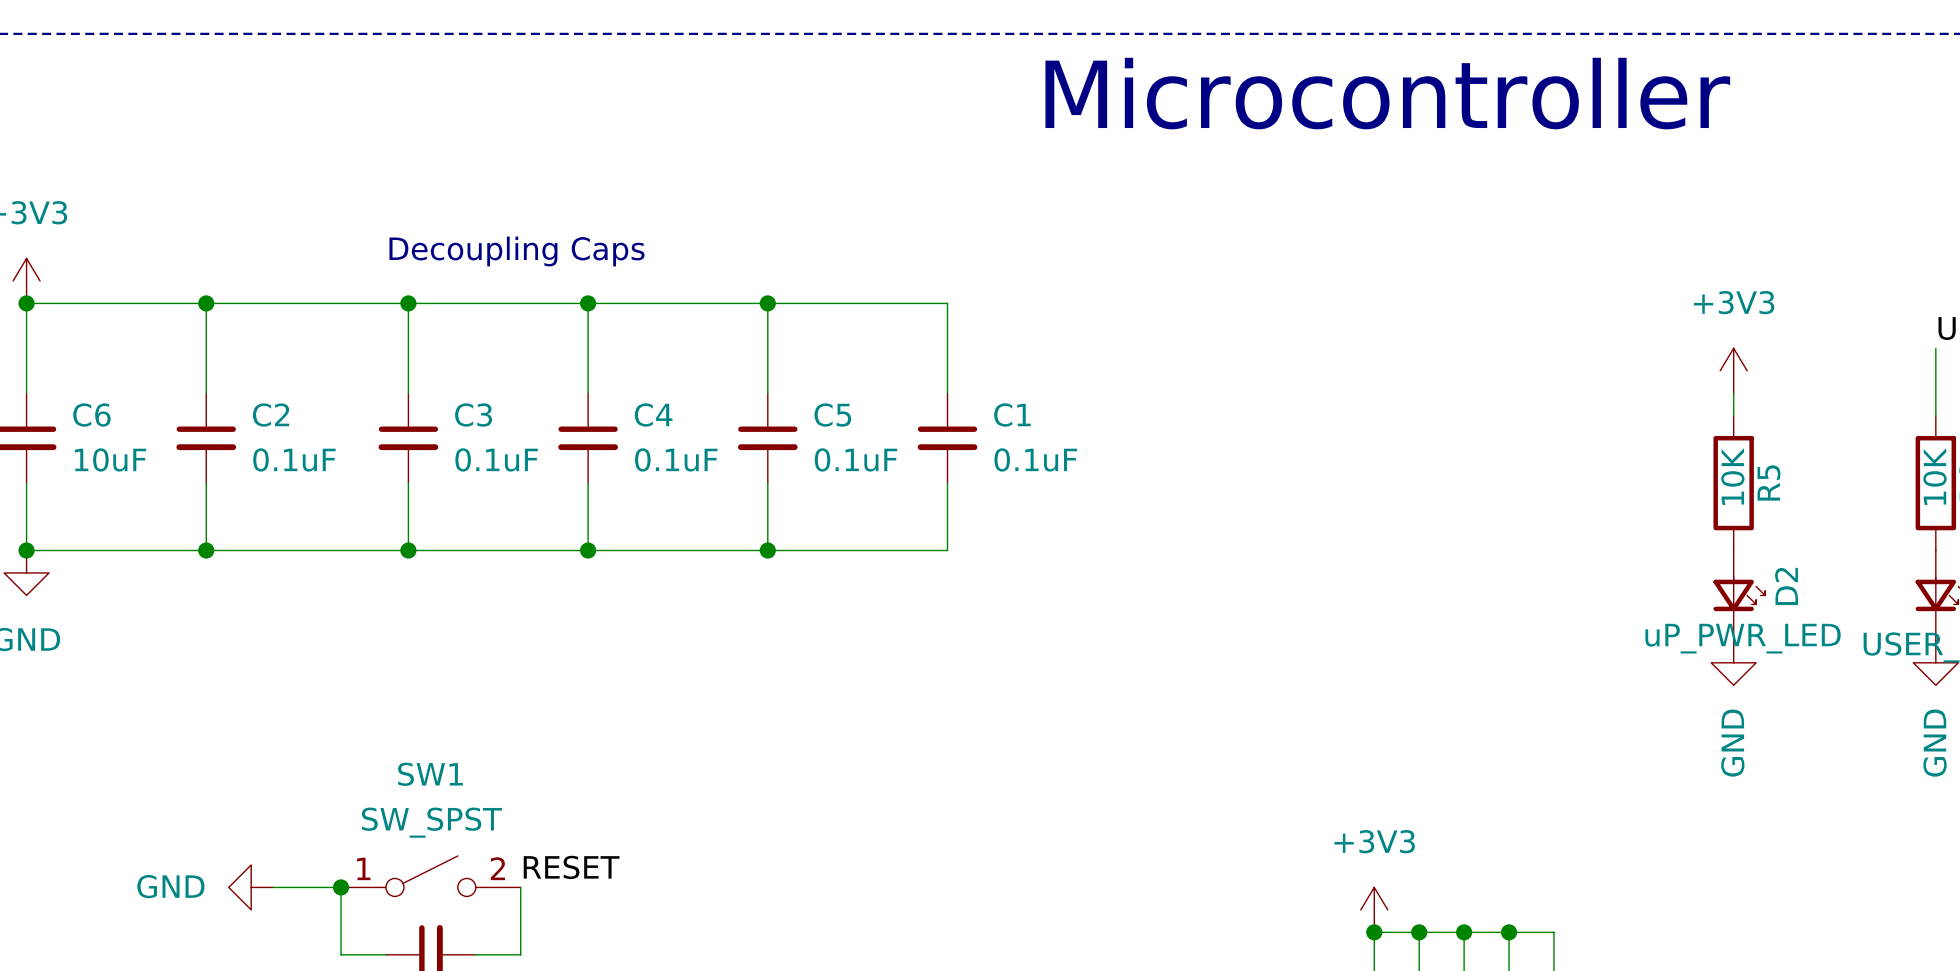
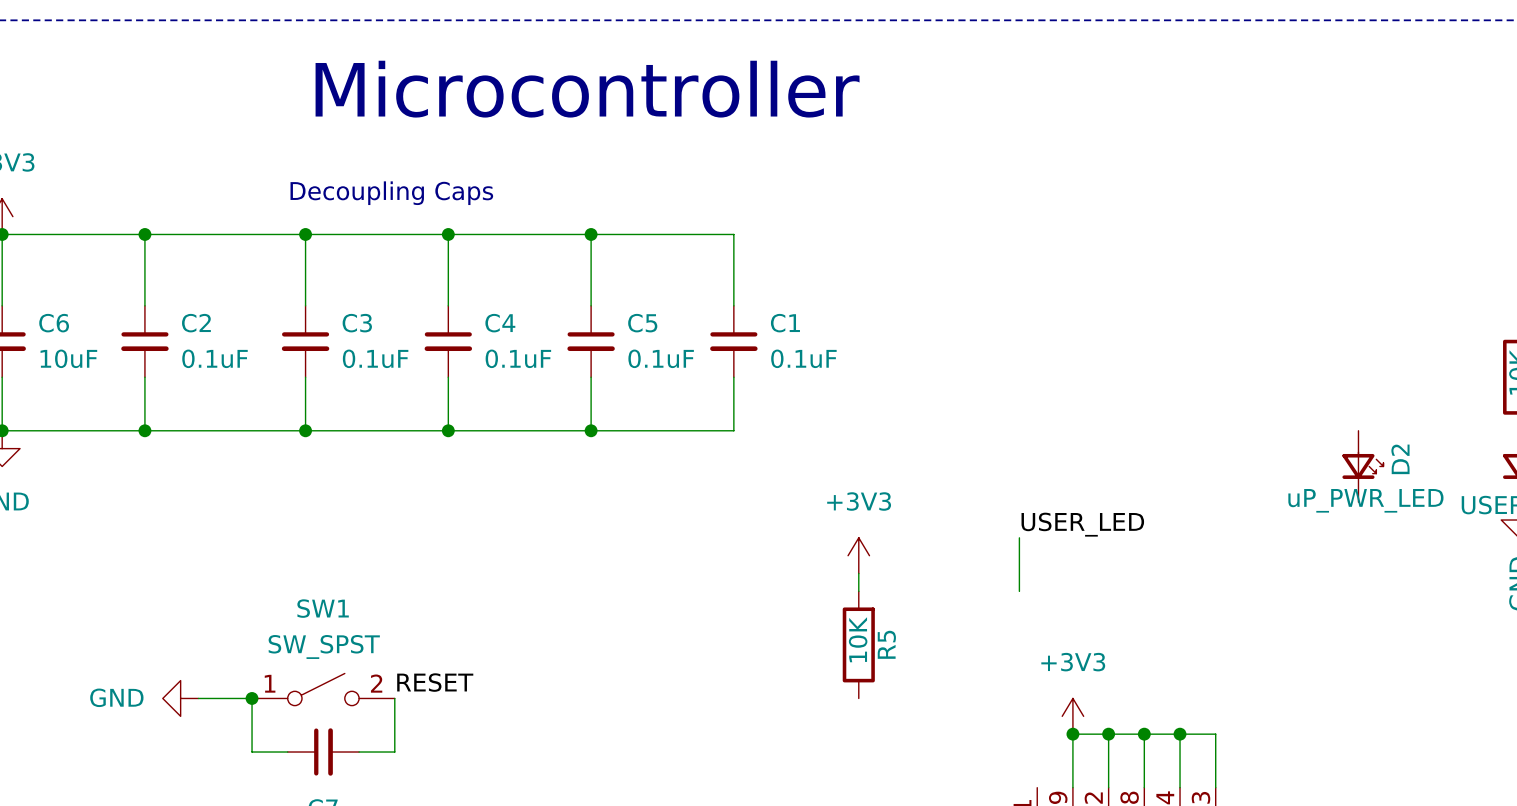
text: Microcontroller (1387, 93) -> none
text: none -> Microcontroller (587, 89)
power symbol: +3V3 (1733, 370) -> none
wire: (1733, 393) (1733, 415) -> none
R5 position: (1733, 483) -> (858, 644)
power symbol: GND (1733, 662) -> none
label: none -> USER_LED (1082, 524)
wire: none -> (1019, 537) (1019, 591)
power symbol: none -> +3V3 (858, 555)
wire: none -> (858, 573) (858, 591)

